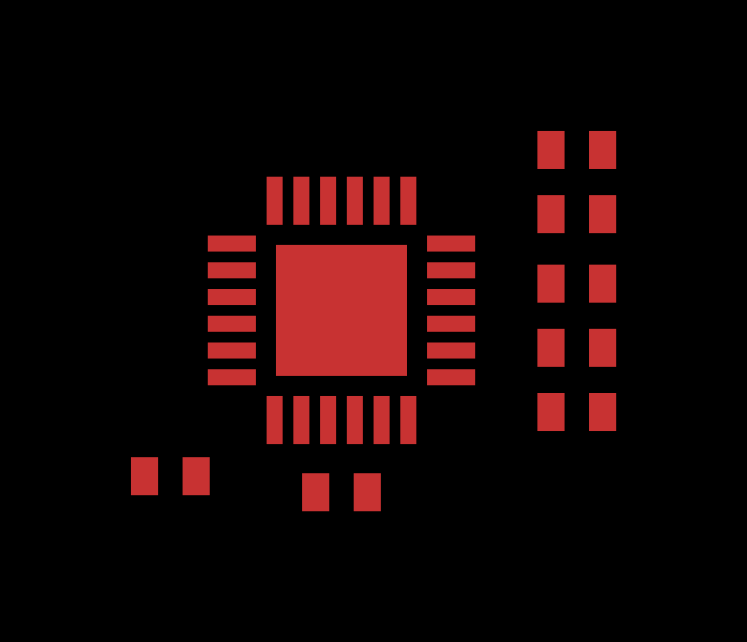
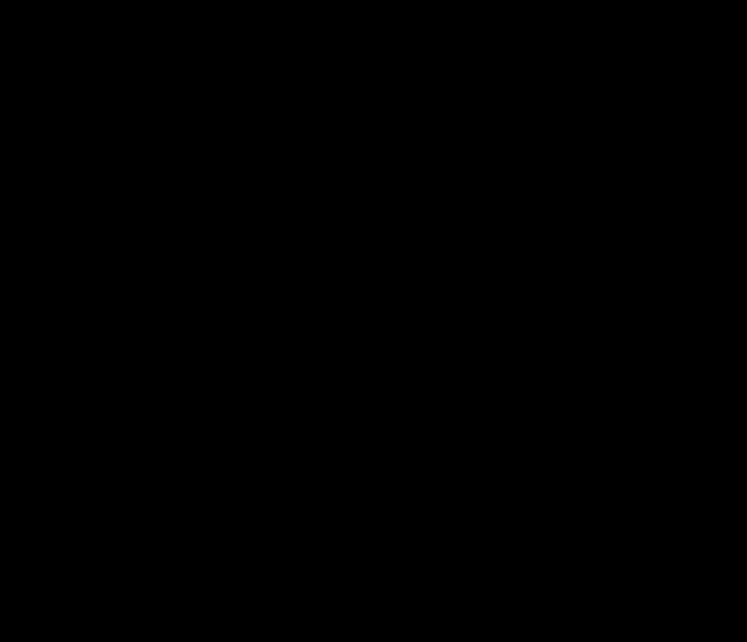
part: (576, 149) -> none
part: (576, 214) -> none
part: (576, 283) -> none
part: (341, 310) -> none
part: (576, 347) -> none
part: (576, 412) -> none
part: (170, 476) -> none
part: (341, 492) -> none

